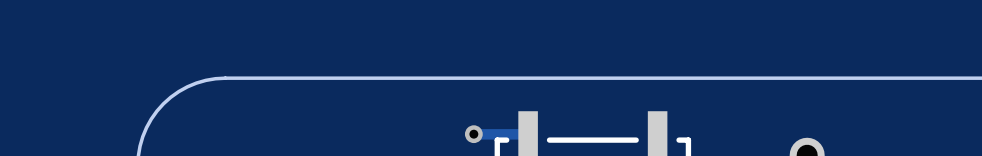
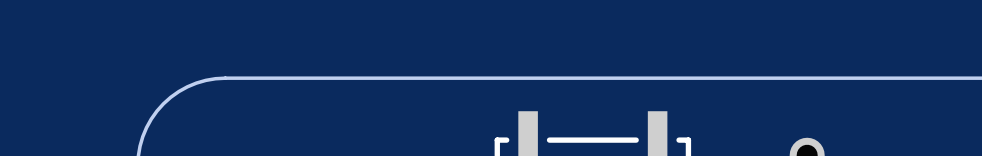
via: (473, 134) -> none
track: (474, 134) (528, 134) -> none

